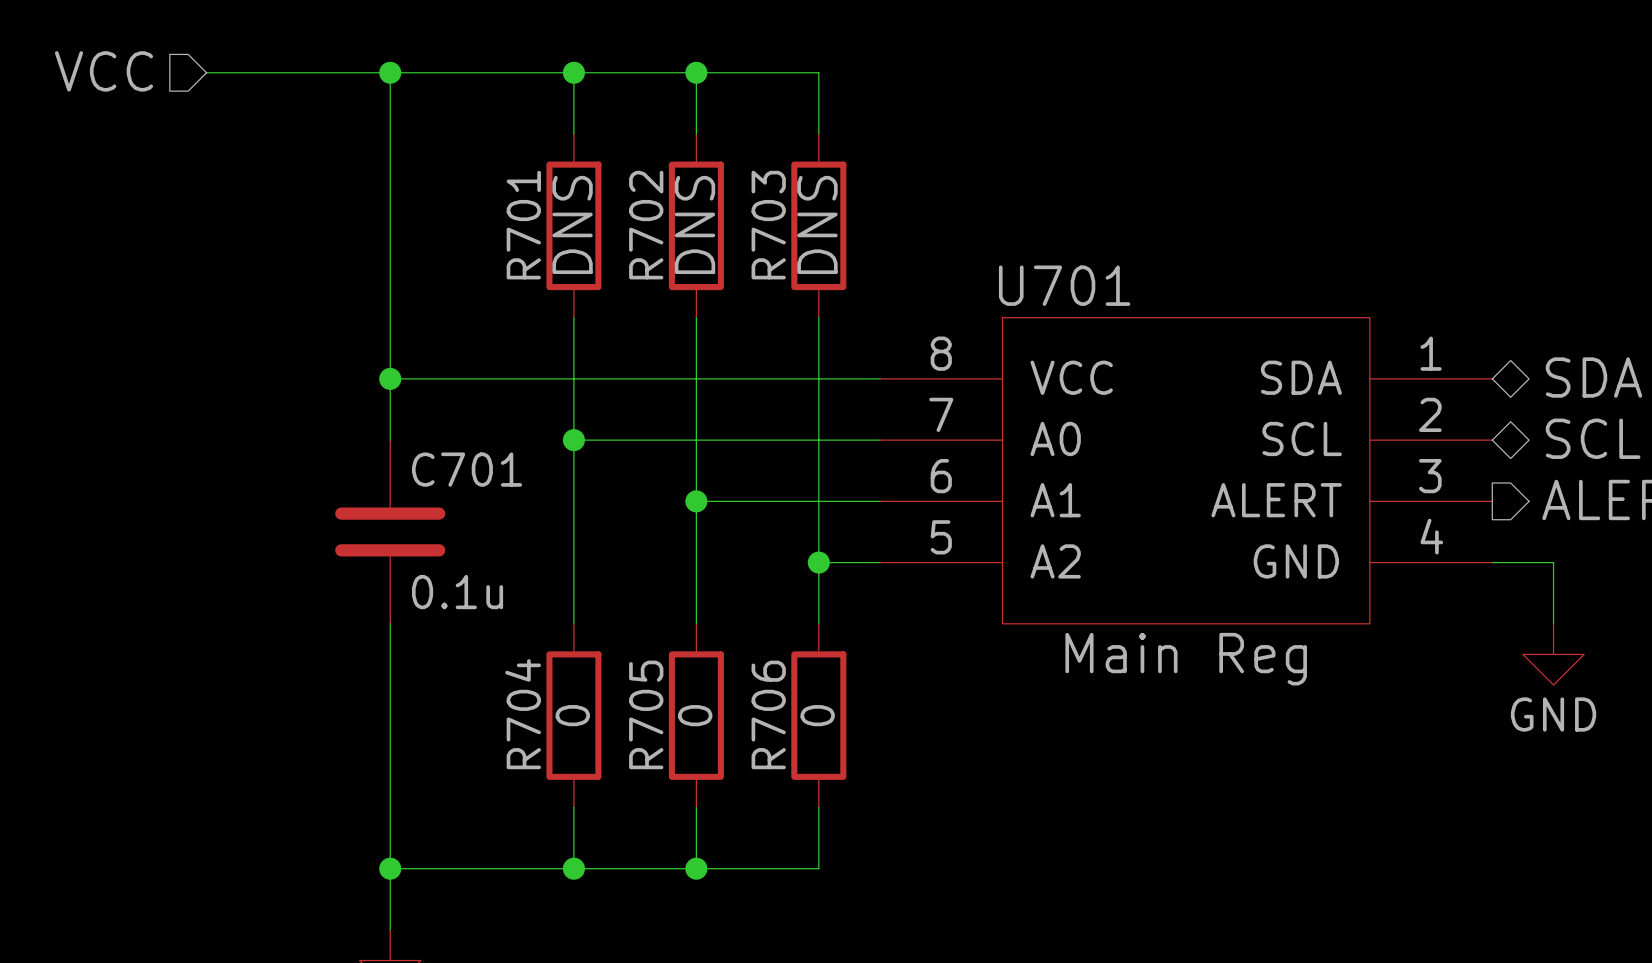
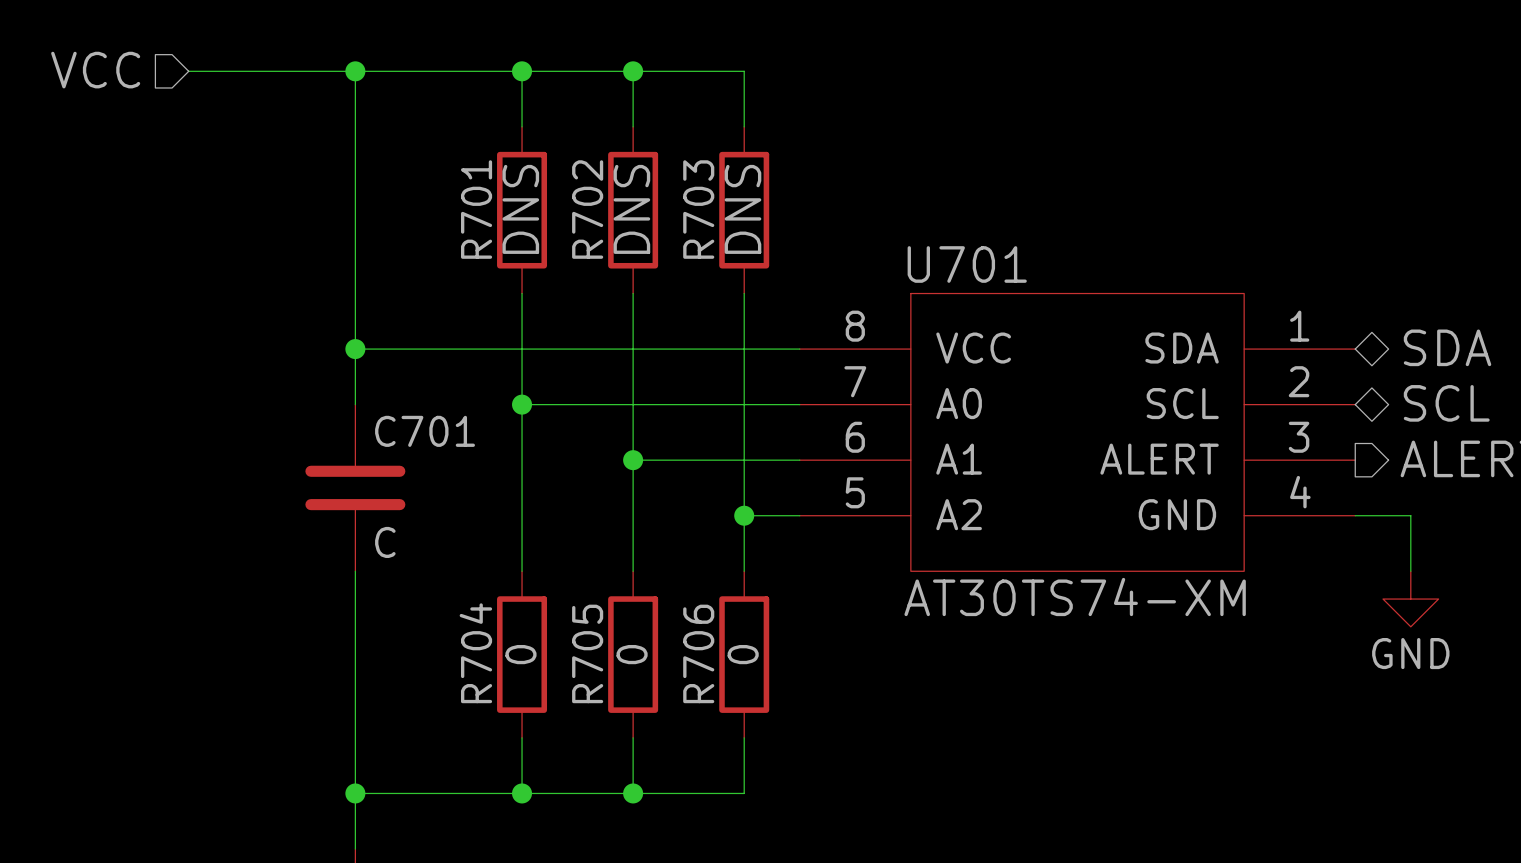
C701 value: 0.1u (457, 592) -> C (385, 542)
U701 value: Main Reg (1186, 659) -> AT30TS74-XM (1075, 597)

